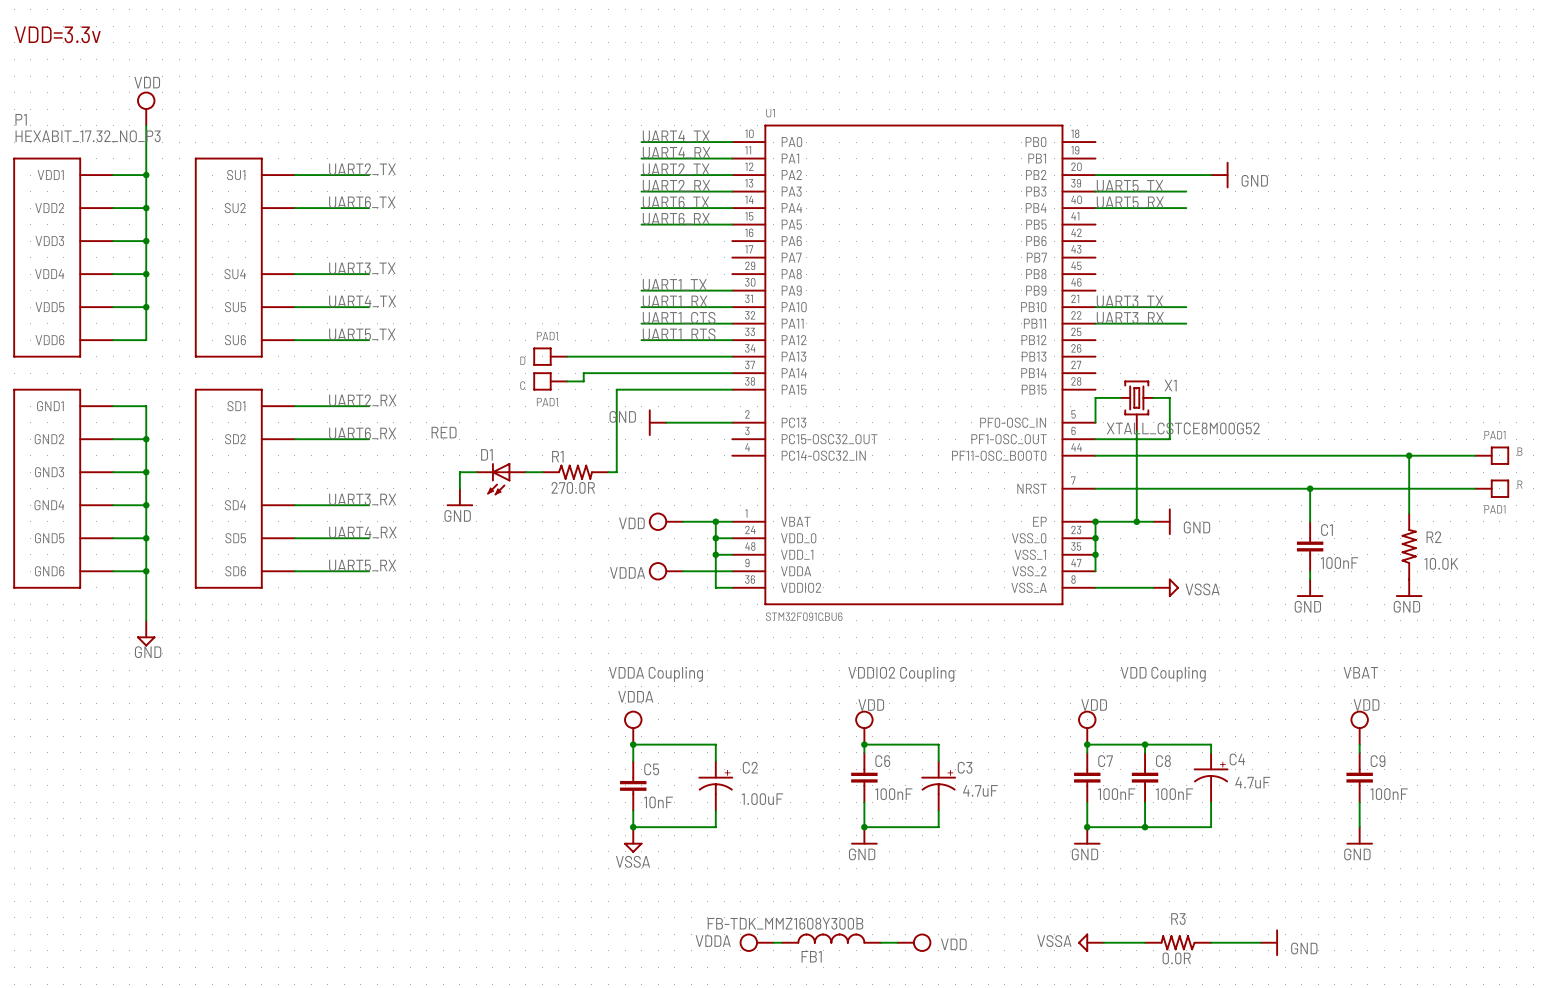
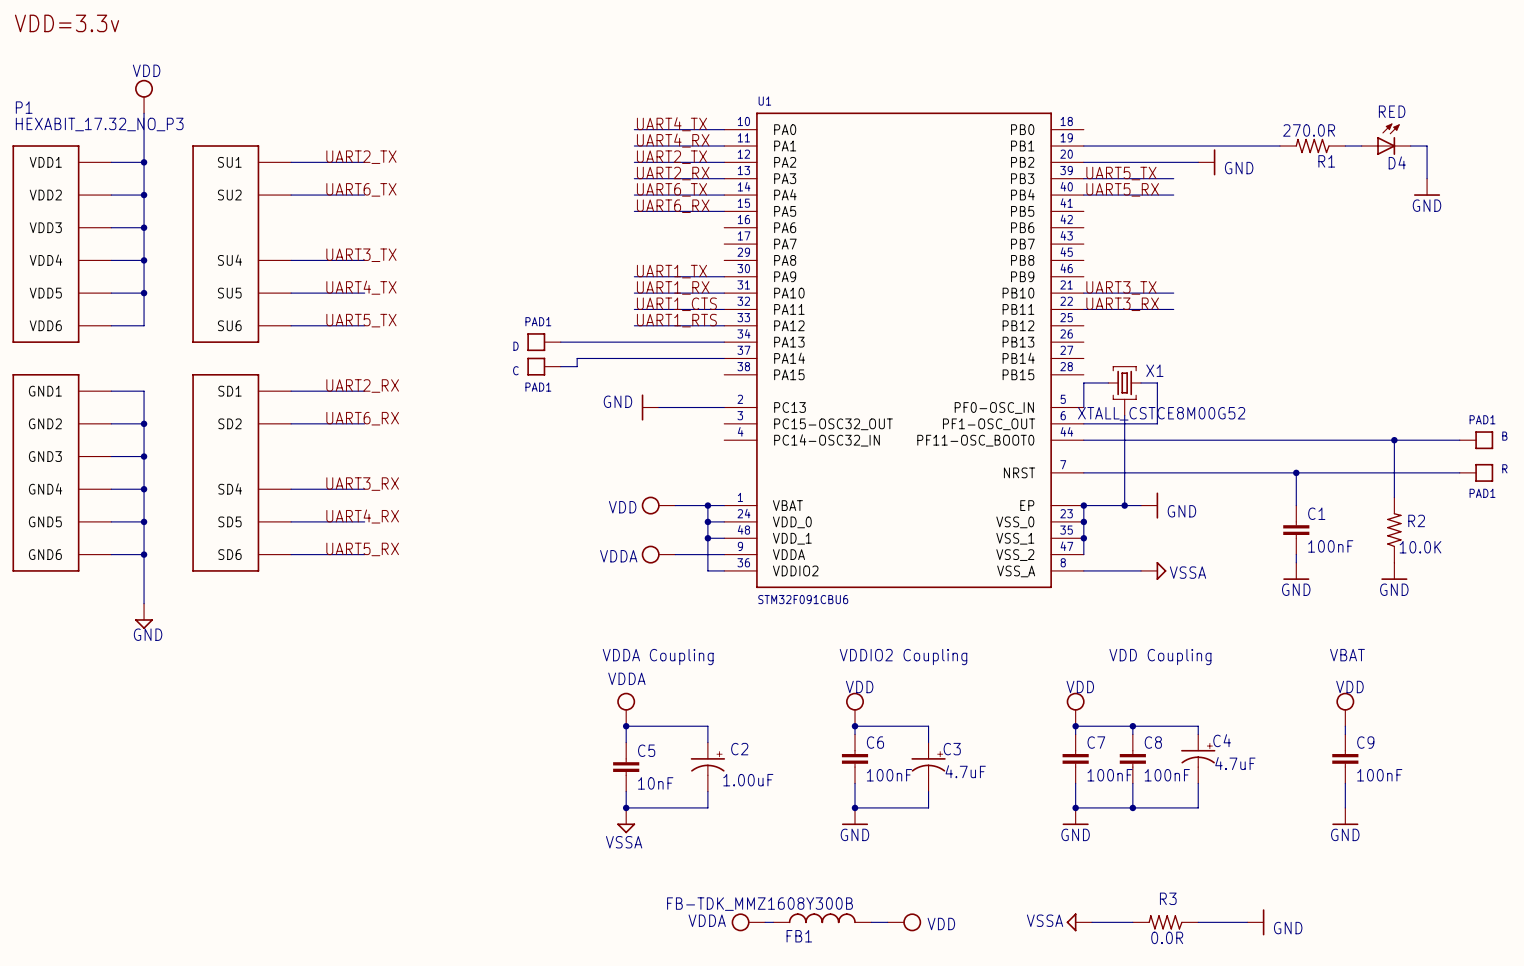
D4: none -> RED (1386, 139)
wire: none -> (1083, 146) (1279, 146)
wire: none -> (1345, 146) (1361, 146)
wire: none -> (1410, 146) (1427, 146) (1427, 178)
power symbol: none -> GND (1427, 187)
wire: (732, 389) (616, 389) (616, 472) (608, 472) -> none
wire: (476, 472) (459, 472) (459, 488) -> none
wire: (525, 472) (542, 472) -> none
R1 rotation: 0° (575, 472) -> 180° (1312, 146)
R1 position: (575, 472) -> (1312, 146)
D1: RED (501, 479) -> none
power symbol: GND (459, 497) -> none

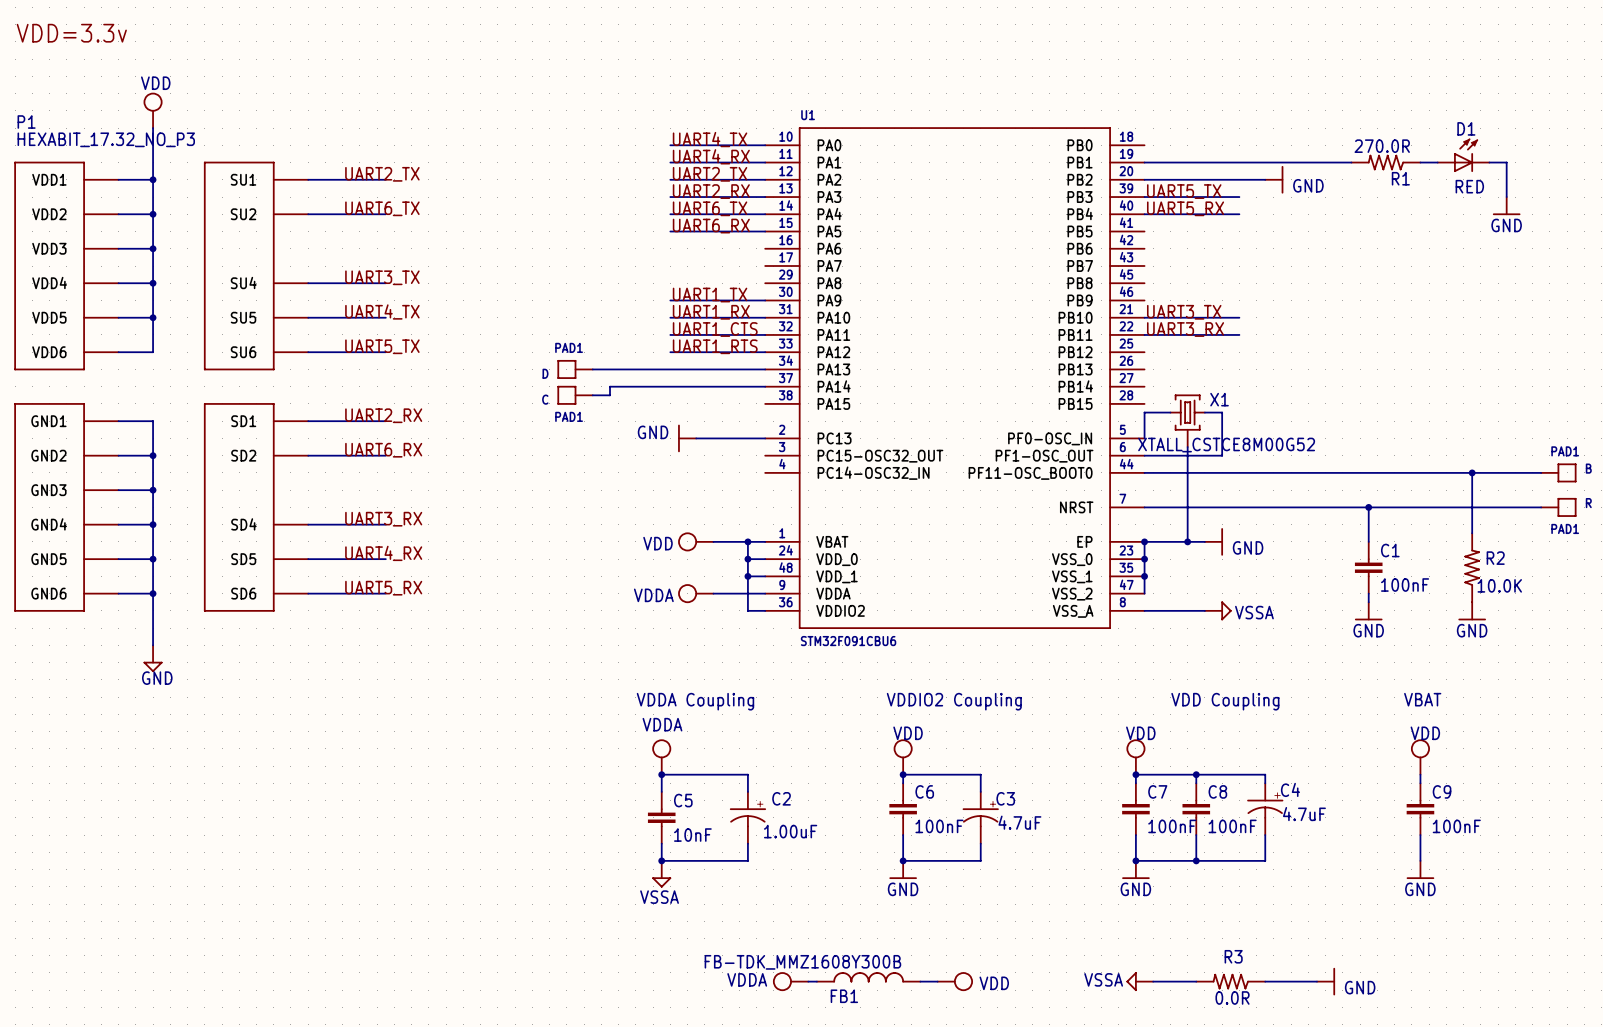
D4 value position: RED (1392, 111) -> RED (1469, 186)
D4 name: D4 (1397, 162) -> D1 (1466, 128)

